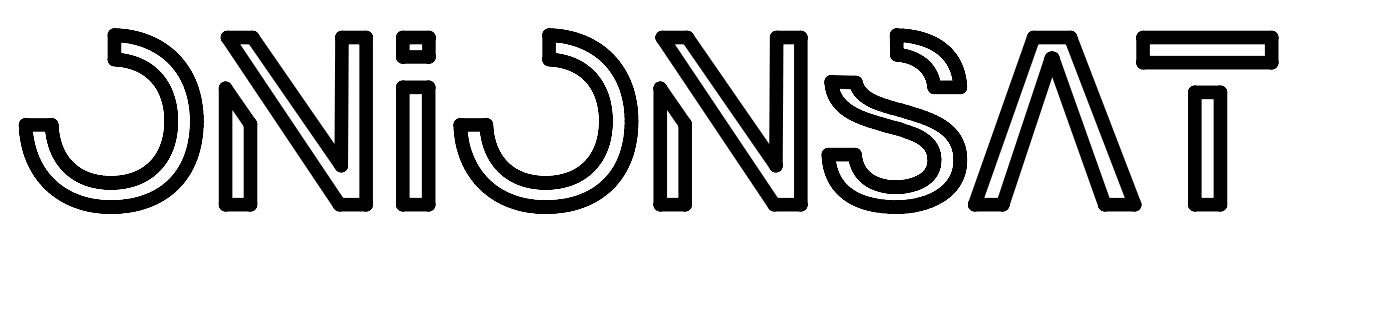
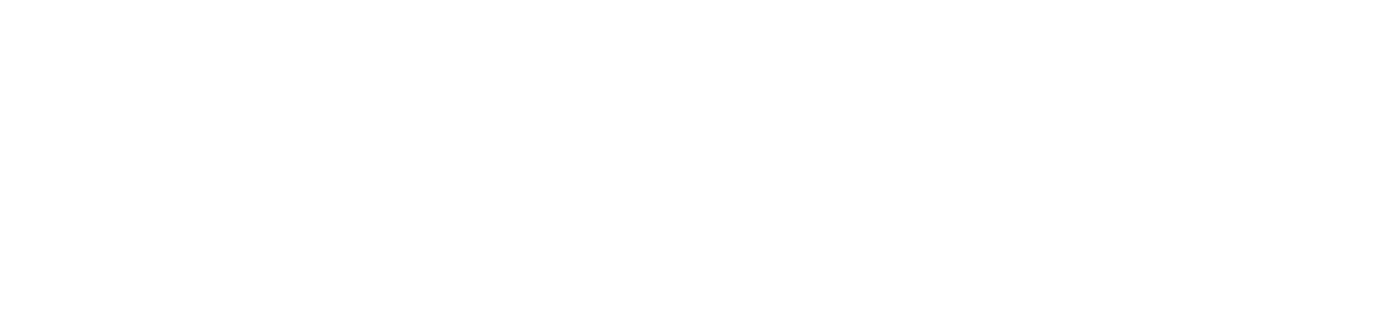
line: (114, 35) (114, 59) (132, 62) (147, 69) (160, 83) (168, 99) (171, 117) (169, 137) (164, 152) (154, 166) (141, 176) (127, 181) (107, 182) (89, 179) (74, 172) (61, 158) (54, 143) (51, 124) (25, 124) (31, 154) (38, 169) (47, 181) (59, 192) (72, 199) (88, 204) (106, 206) (125, 206) (142, 202) (157, 196) (170, 187) (181, 175) (189, 161) (194, 144) (196, 126) (195, 107) (192, 90) (185, 75) (176, 62) (165, 51) (148, 41) (132, 37) (114, 35) -> none
line: (549, 35) (549, 59) (567, 62) (582, 69) (595, 83) (602, 99) (605, 117) (604, 137) (599, 152) (589, 166) (575, 176) (561, 181) (542, 182) (524, 179) (509, 172) (497, 160) (489, 143) (486, 124) (460, 124) (465, 154) (472, 169) (482, 181) (493, 192) (507, 199) (523, 204) (540, 206) (559, 206) (577, 202) (592, 196) (605, 187) (615, 175) (623, 161) (629, 144) (631, 126) (630, 107) (626, 90) (620, 75) (611, 62) (599, 51) (582, 41) (566, 37) (549, 35) -> none
line: (896, 35) (896, 54) (910, 57) (923, 64) (931, 75) (934, 87) (960, 87) (955, 66) (942, 49) (923, 39) (896, 35) -> none
line: (227, 37) (252, 37) (341, 165) (341, 37) (366, 37) (366, 204) (339, 204) (227, 37) -> none
line: (402, 37) (402, 56) (428, 56) (428, 37) (402, 37) -> none
line: (662, 37) (687, 37) (775, 165) (776, 37) (800, 37) (800, 204) (774, 204) (662, 37) -> none
line: (1033, 37) (974, 204) (1002, 204) (1051, 58) (1104, 204) (1134, 204) (1070, 37) (1033, 37) -> none
line: (1143, 37) (1271, 37) (1271, 62) (1143, 62) (1143, 37) -> none
line: (831, 81) (836, 98) (846, 109) (866, 119) (918, 136) (929, 144) (934, 156) (932, 169) (925, 178) (914, 184) (895, 187) (881, 185) (867, 178) (858, 167) (854, 154) (828, 154) (833, 176) (844, 191) (867, 203) (902, 206) (930, 200) (950, 187) (958, 174) (960, 157) (956, 141) (947, 130) (924, 117) (872, 100) (860, 92) (855, 82) (831, 81) -> none
line: (402, 87) (428, 87) (428, 204) (402, 204) (402, 87) -> none
line: (225, 88) (225, 204) (250, 204) (250, 124) (225, 88) -> none
line: (660, 88) (660, 204) (685, 204) (685, 124) (660, 88) -> none
line: (1194, 92) (1194, 204) (1220, 204) (1220, 92) (1194, 92) -> none

